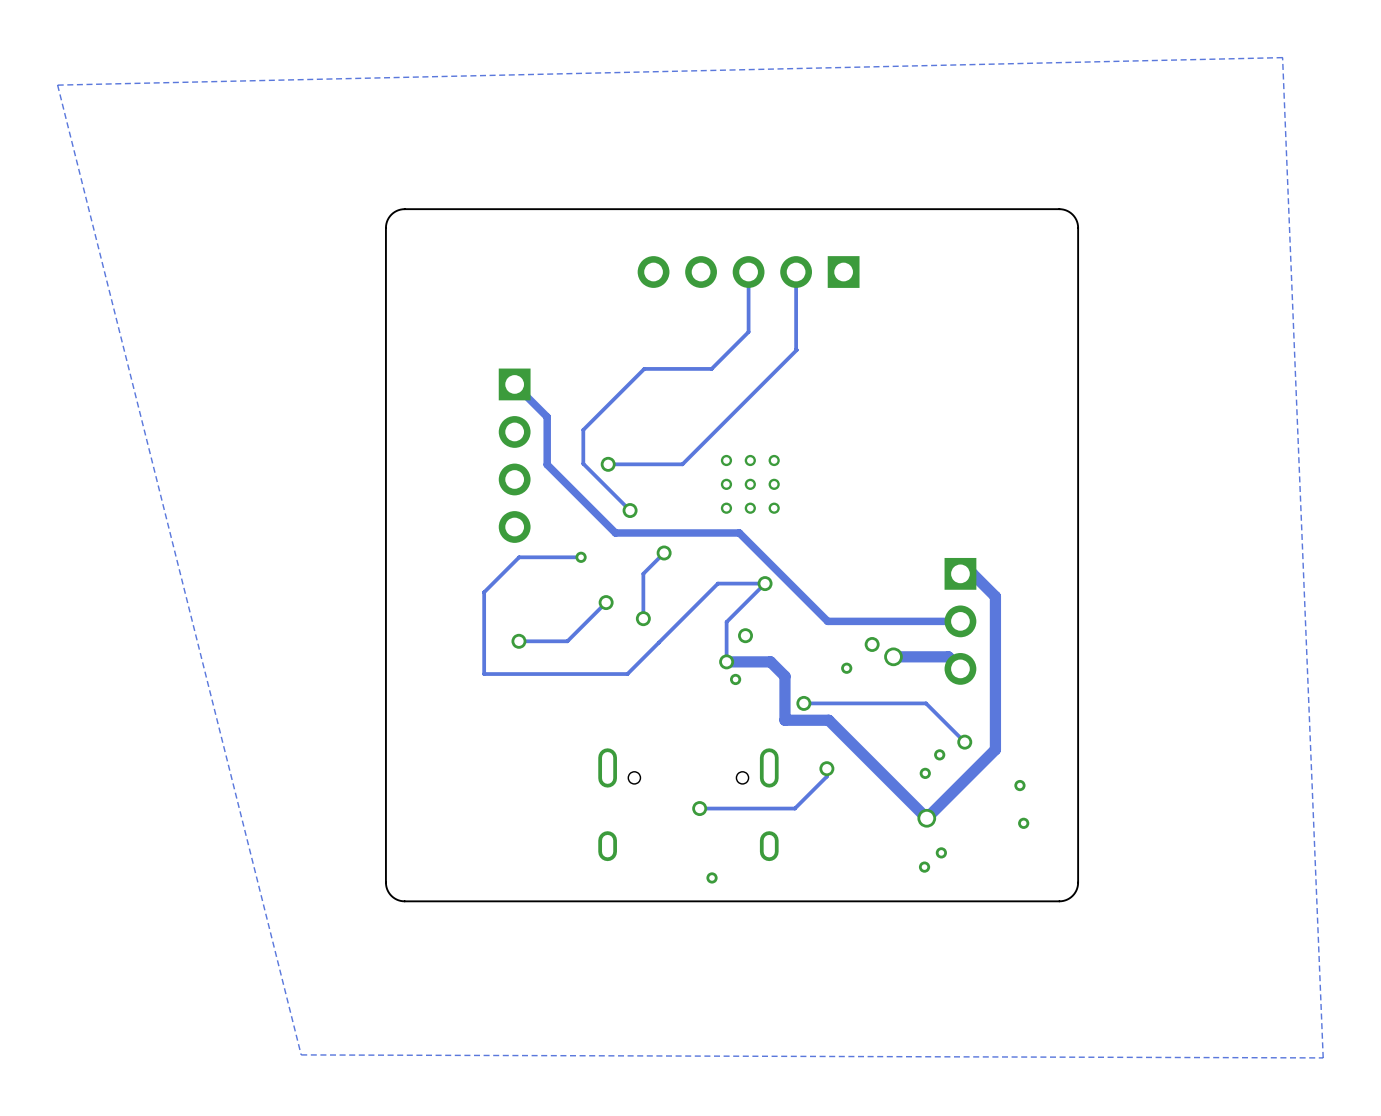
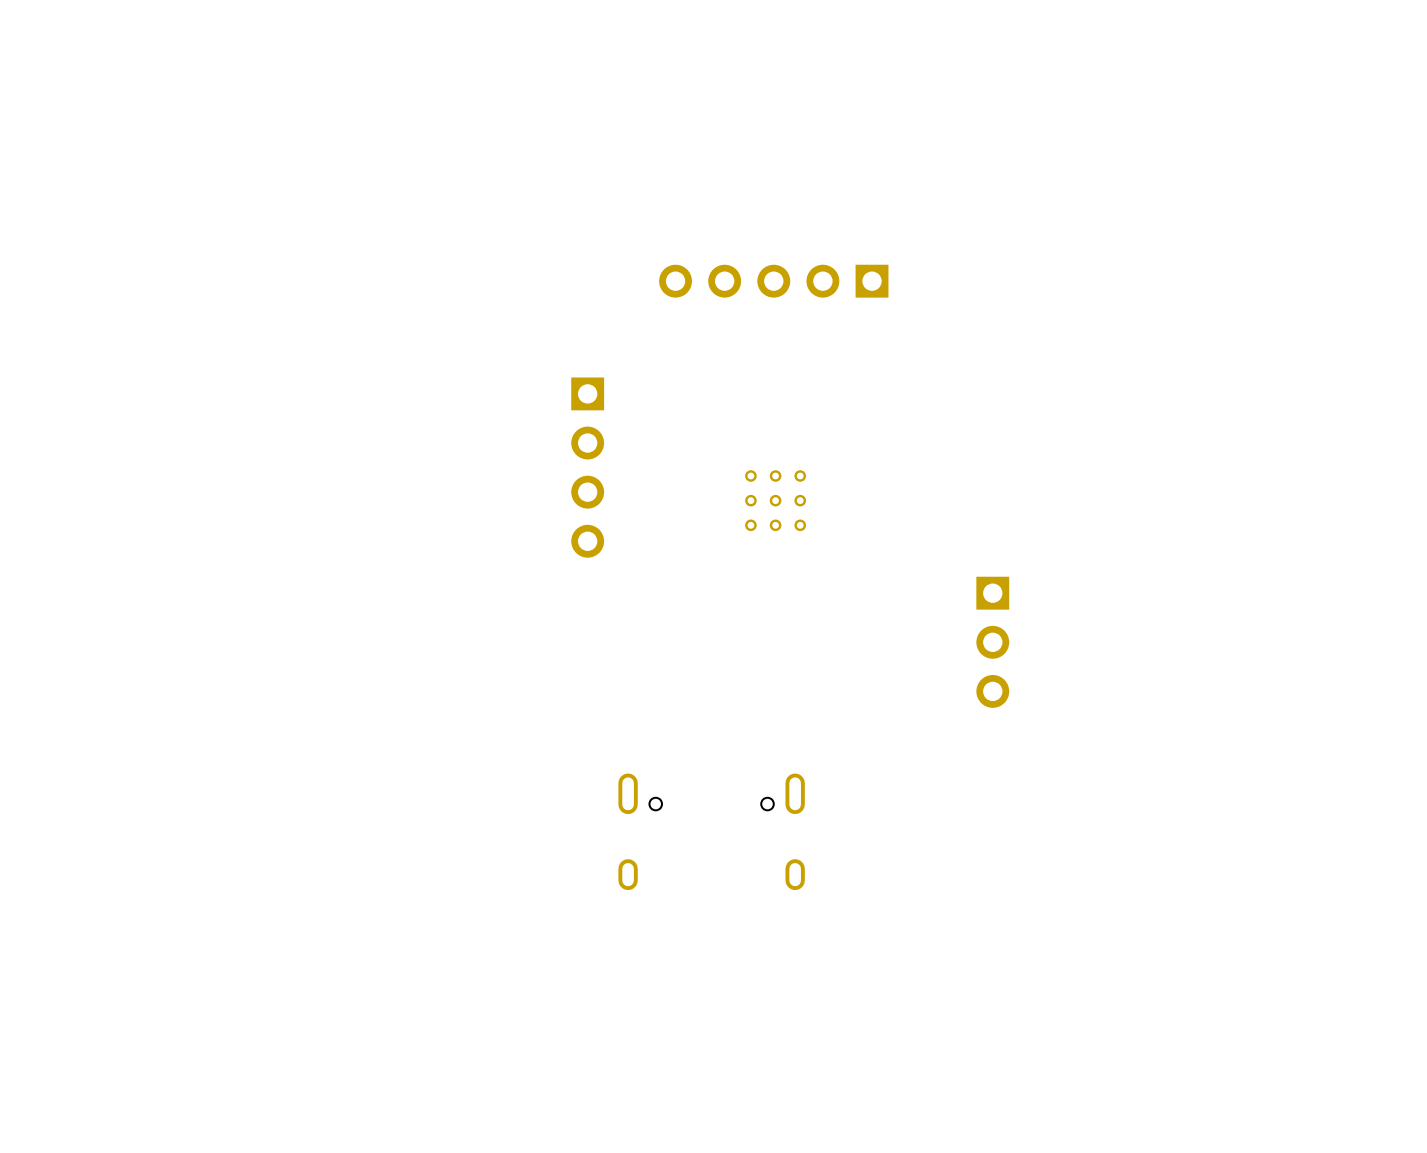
zone outline: (1282, 57) (1323, 1057) (301, 1054) (57, 85) (1282, 57) -> none
board edge: (1059, 209) (404, 209) (391, 214) (385, 227) (385, 882) (391, 895) (404, 901) (1059, 901) (1072, 895) (1078, 882) (1078, 227) (1072, 214) (1059, 209) -> none
track: (748, 272) (748, 331) (711, 368) (644, 368) (583, 429) (583, 463) (630, 510) -> none
track: (796, 272) (796, 350) (682, 464) (608, 464) -> none
track: (514, 384) (547, 417) (547, 464) (615, 532) (739, 532) (827, 621) (960, 621) -> none
part position: (514, 455) -> (587, 467)
via: (608, 464) -> none
via: (630, 510) -> none
track: (664, 553) (643, 573) (643, 618) -> none
via: (664, 553) -> none
track: (581, 557) (519, 557) (484, 592) (484, 674) (627, 674) (717, 583) (765, 583) (726, 622) (726, 661) (770, 661) (784, 676) (784, 720) (828, 720) (926, 818) (995, 749) (995, 596) (972, 573) (960, 573) -> none
via: (581, 557) -> none
via: (765, 583) -> none
track: (606, 602) (567, 641) (518, 641) -> none
via: (606, 602) -> none
via: (643, 618) -> none
via: (745, 635) -> none
via: (518, 641) -> none
via: (872, 644) -> none
track: (893, 656) (948, 656) (960, 668) -> none
via: (893, 656) -> none
via: (726, 661) -> none
via: (846, 668) -> none
via: (735, 679) -> none
track: (803, 703) (926, 703) (964, 742) -> none
via: (803, 703) -> none
via: (964, 742) -> none
via: (939, 754) -> none
track: (826, 766) (826, 776) (794, 808) (699, 808) -> none
via: (826, 768) -> none
via: (925, 773) -> none
via: (1019, 785) -> none
via: (699, 808) -> none
via: (926, 818) -> none
via: (1023, 823) -> none
via: (941, 852) -> none
via: (924, 867) -> none
via: (712, 877) -> none

